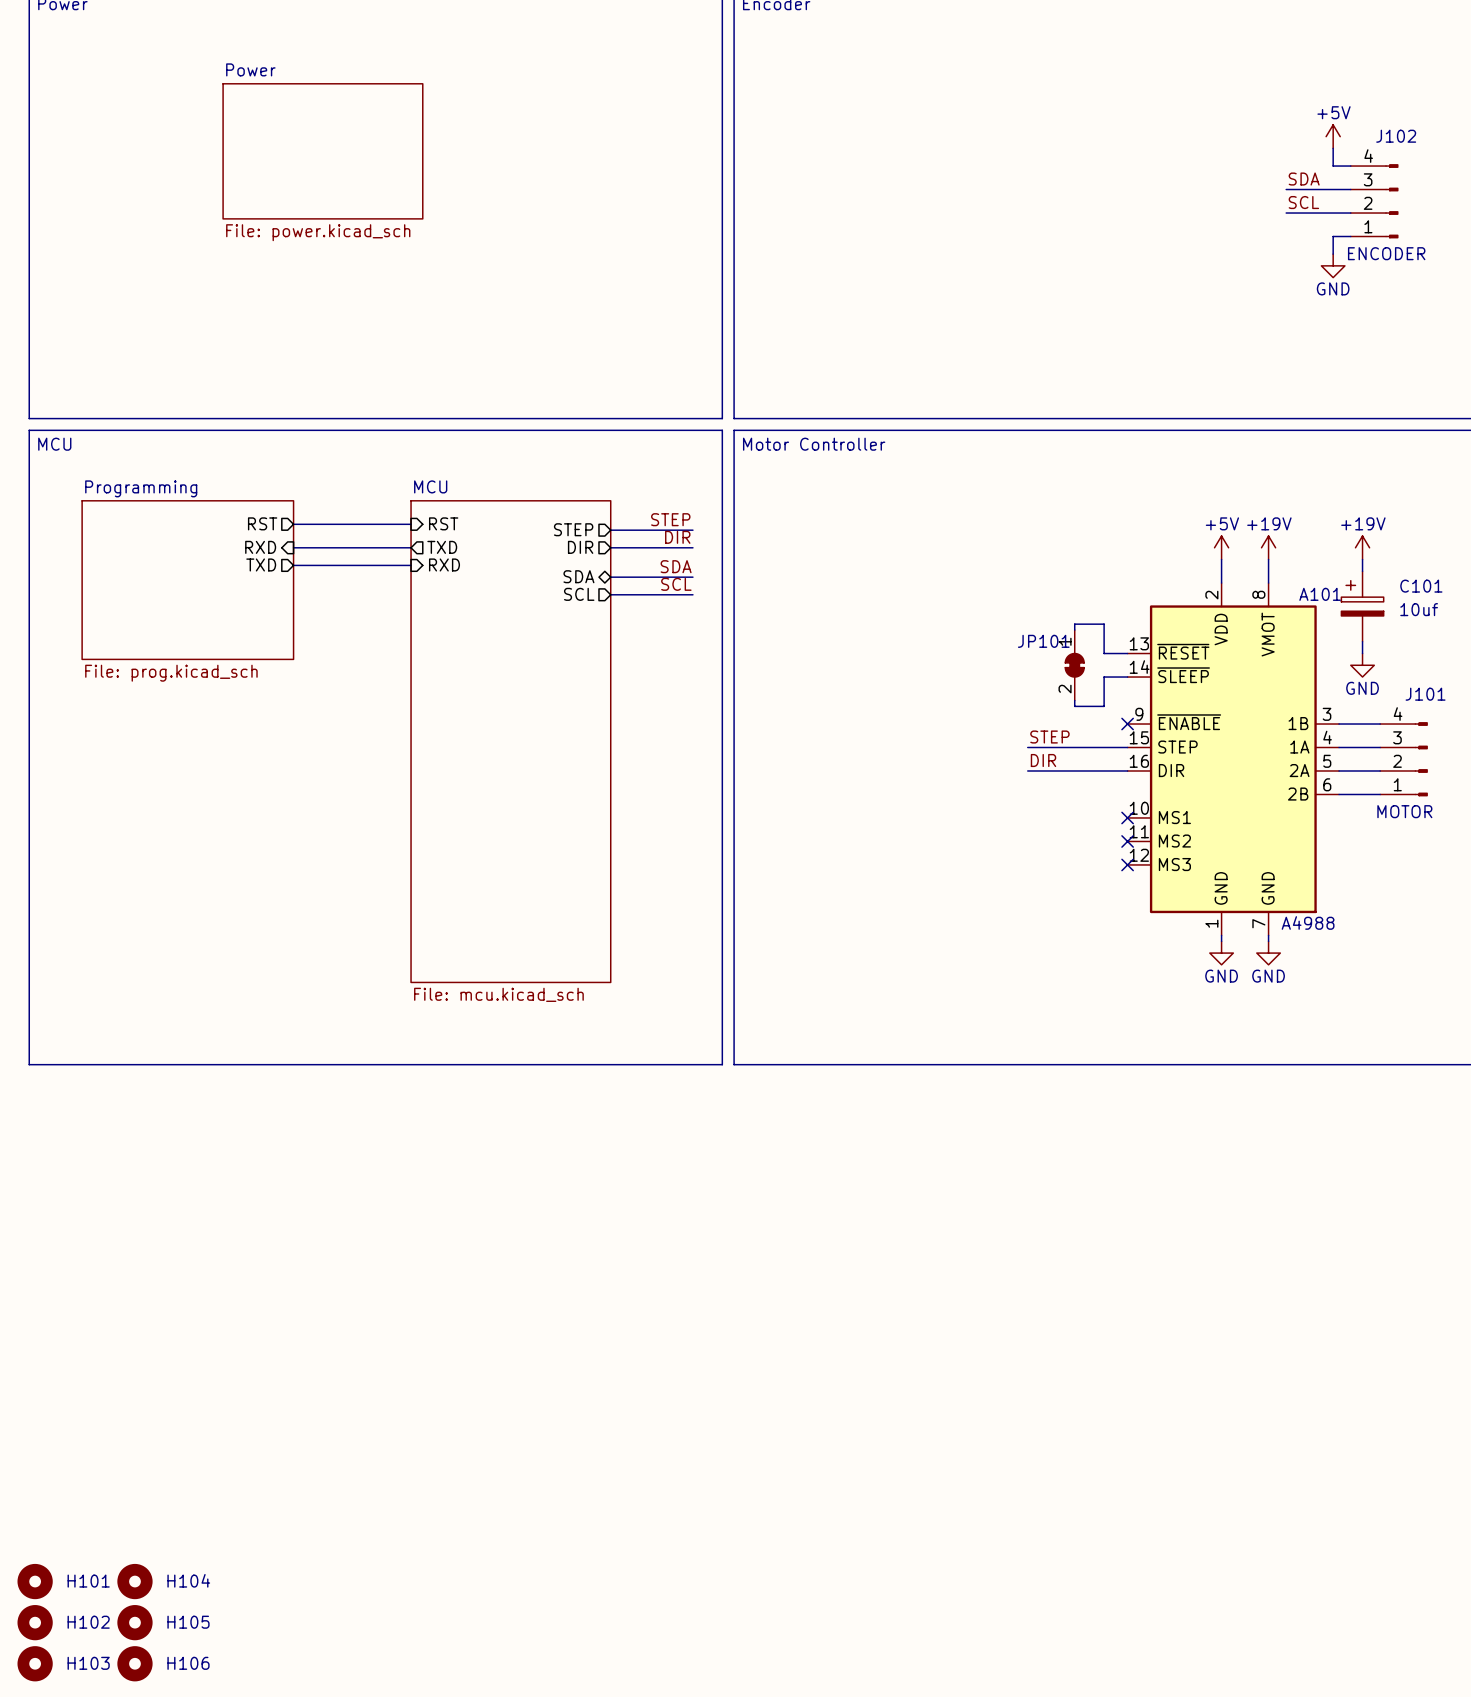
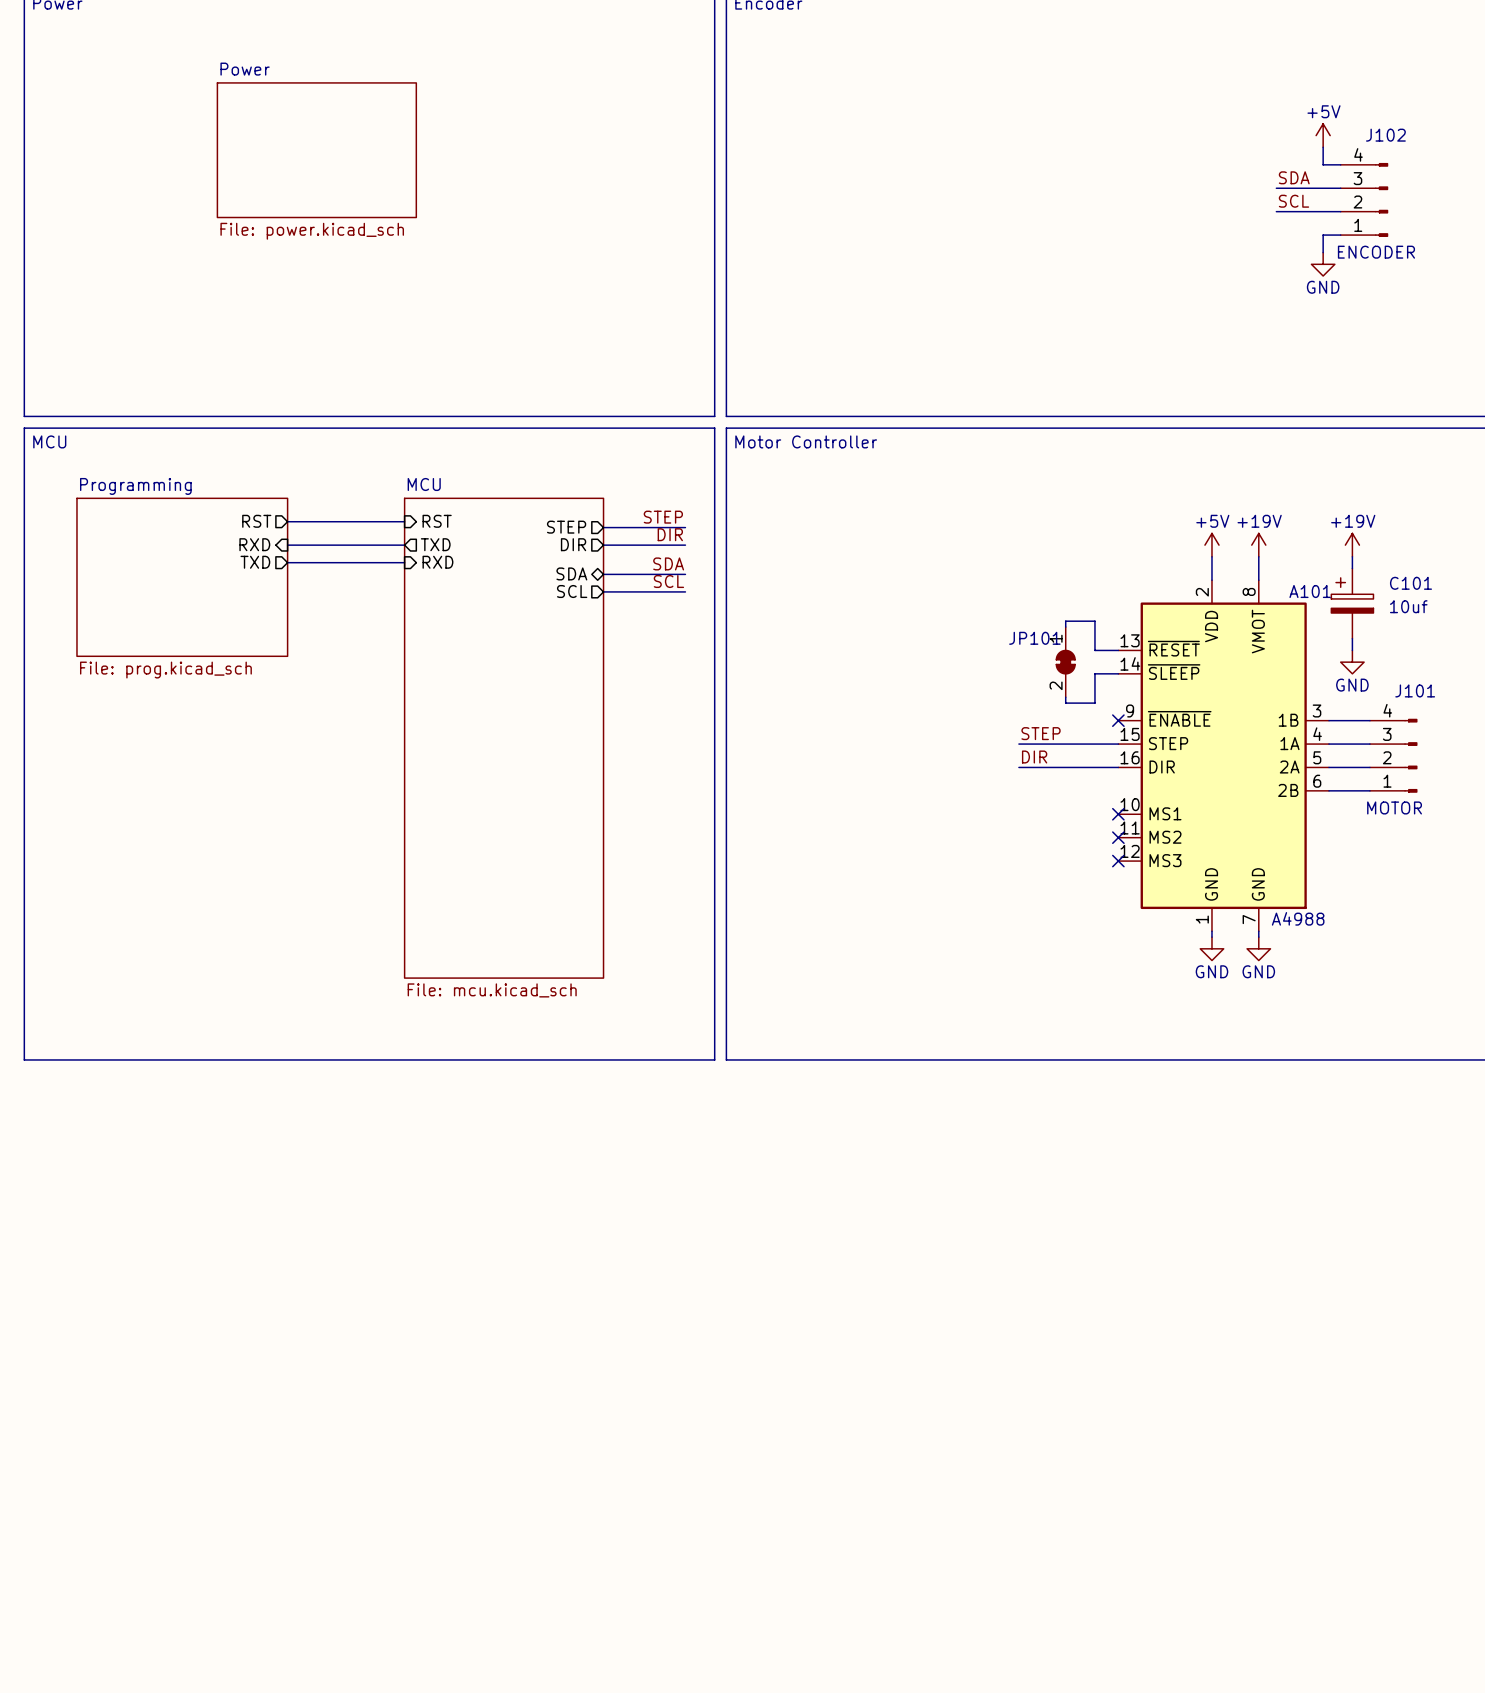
H101: (35, 1581) -> none
H104: (134, 1581) -> none
H102: (35, 1622) -> none
H105: (134, 1622) -> none
H103: (35, 1663) -> none
H106: (134, 1663) -> none

